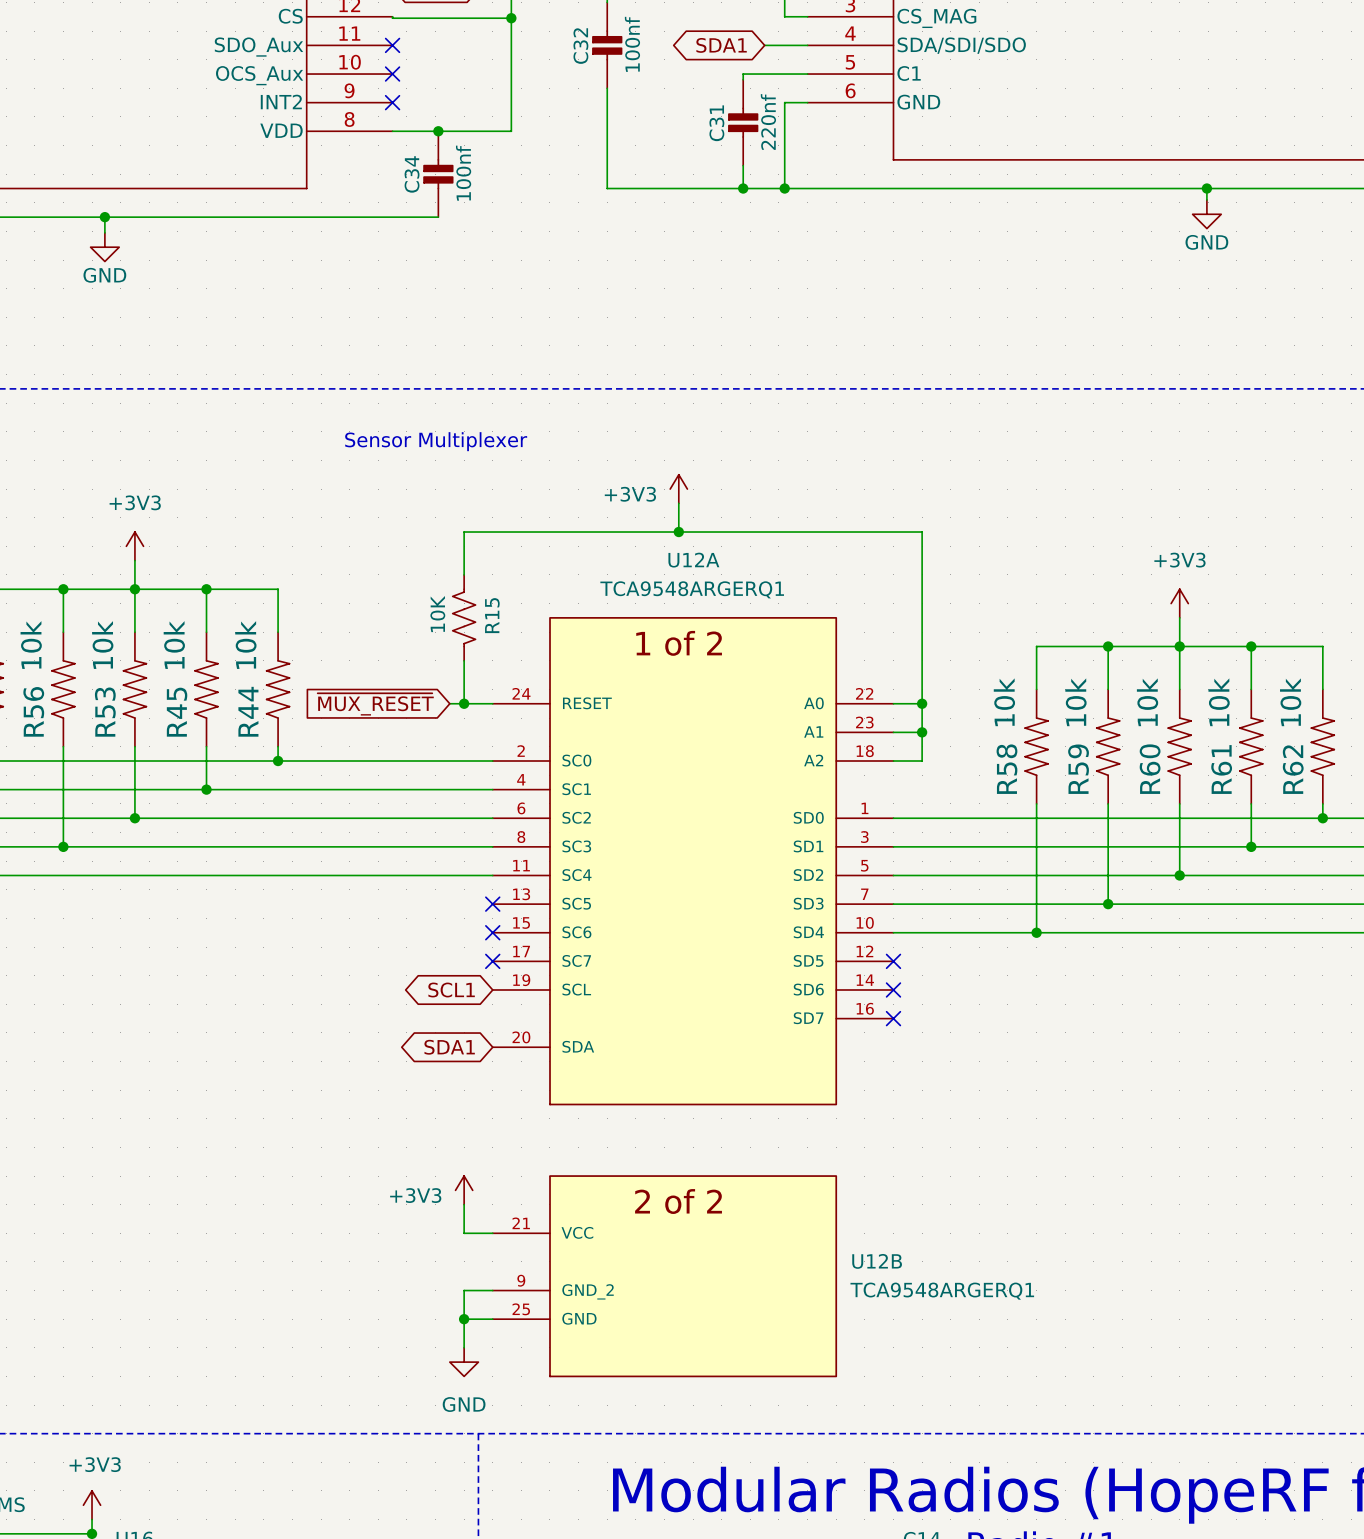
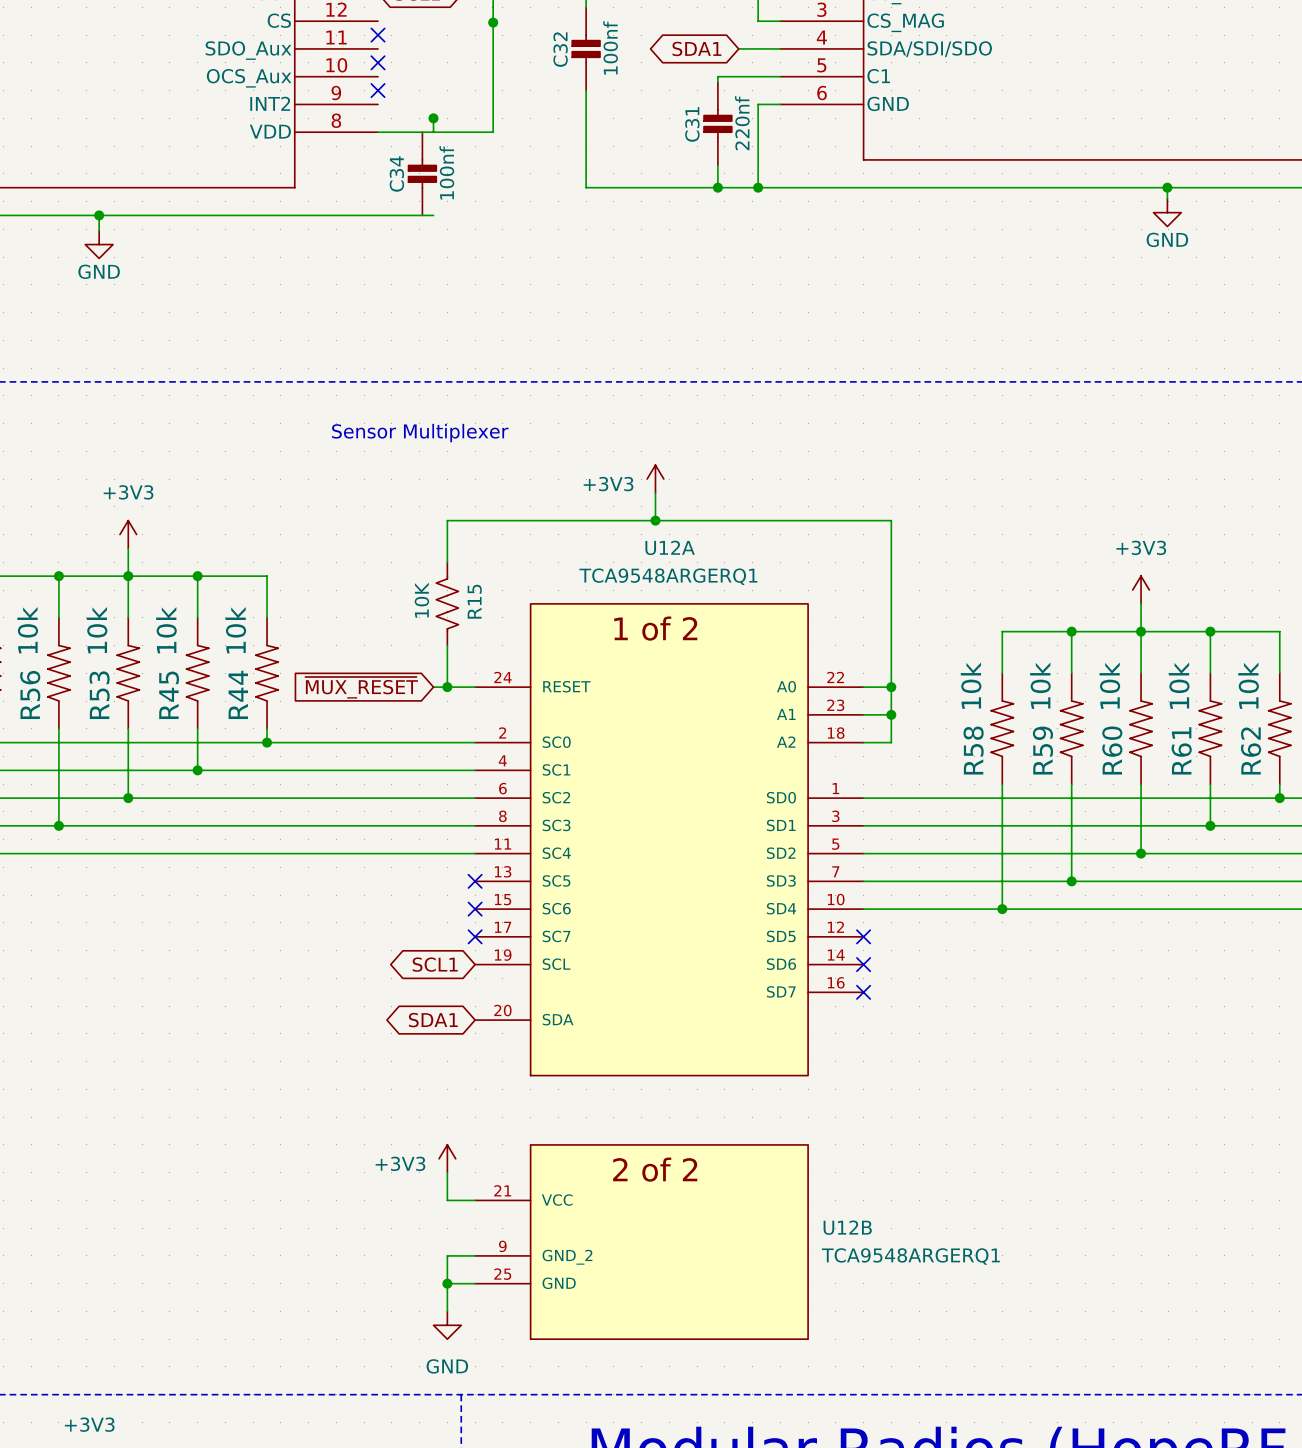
wire: (392, 16) (511, 18) -> none
no-connect mark: none -> (378, 35)
no-connect mark: (392, 45) -> none
no-connect mark: none -> (378, 62)
no-connect mark: (392, 74) -> none
no-connect mark: none -> (378, 90)
no-connect mark: (392, 102) -> none
wire: none -> (433, 118) (433, 132)
junction position: (438, 131) -> (433, 118)
wire: none -> (422, 215) (433, 215)

